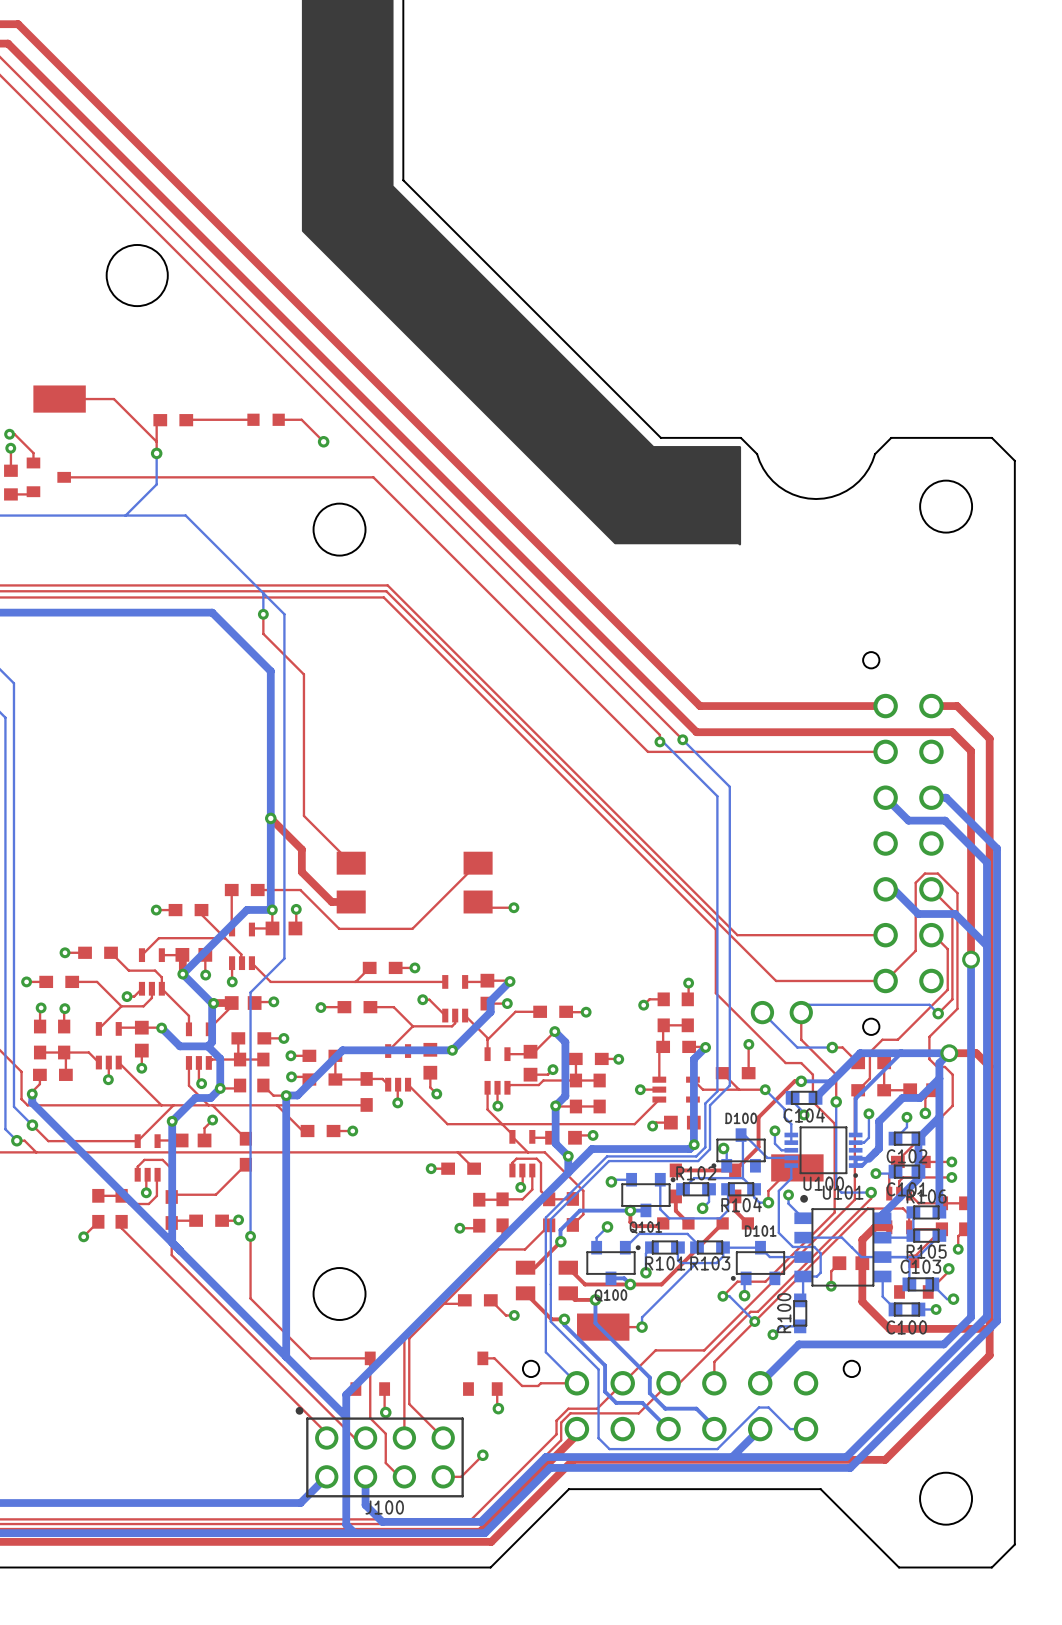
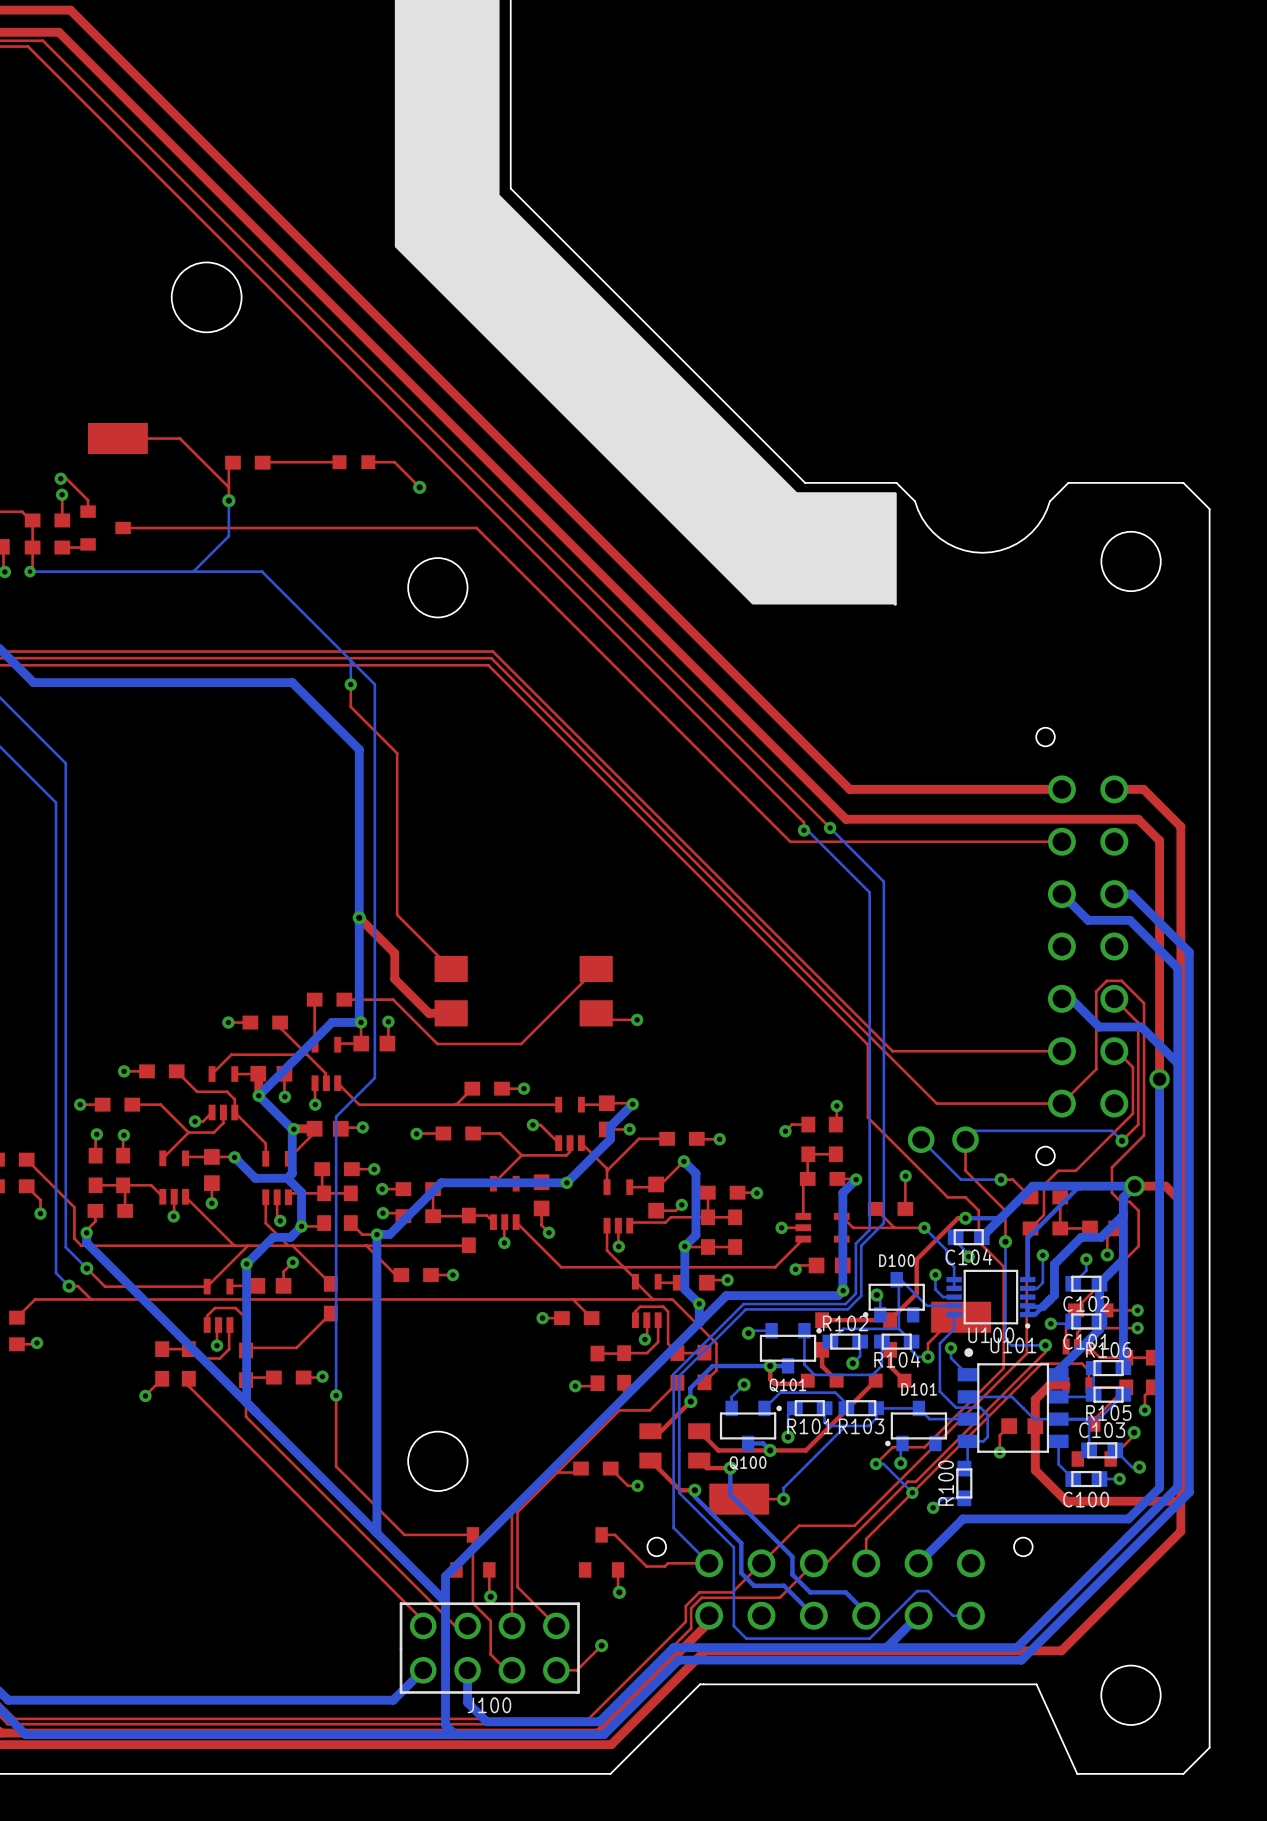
J100 footprint: [295, 1406, 464, 1498] -> [399, 1602, 580, 1694]
board edge: (820, 1489) (899, 1567) -> (987, 1684) (1036, 1684) (1077, 1773)

